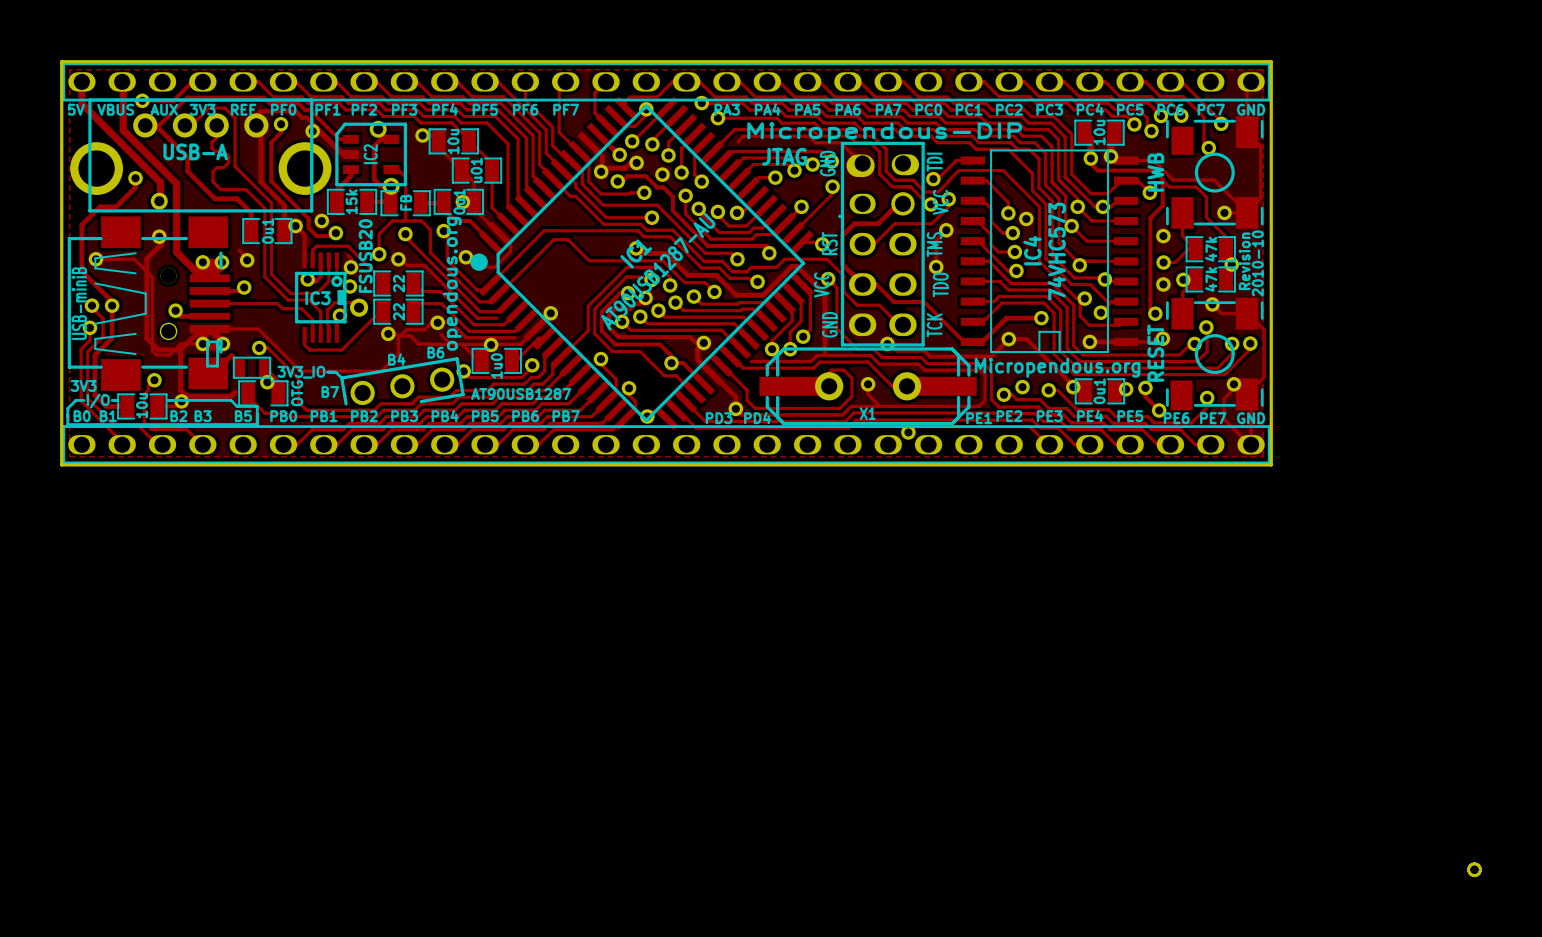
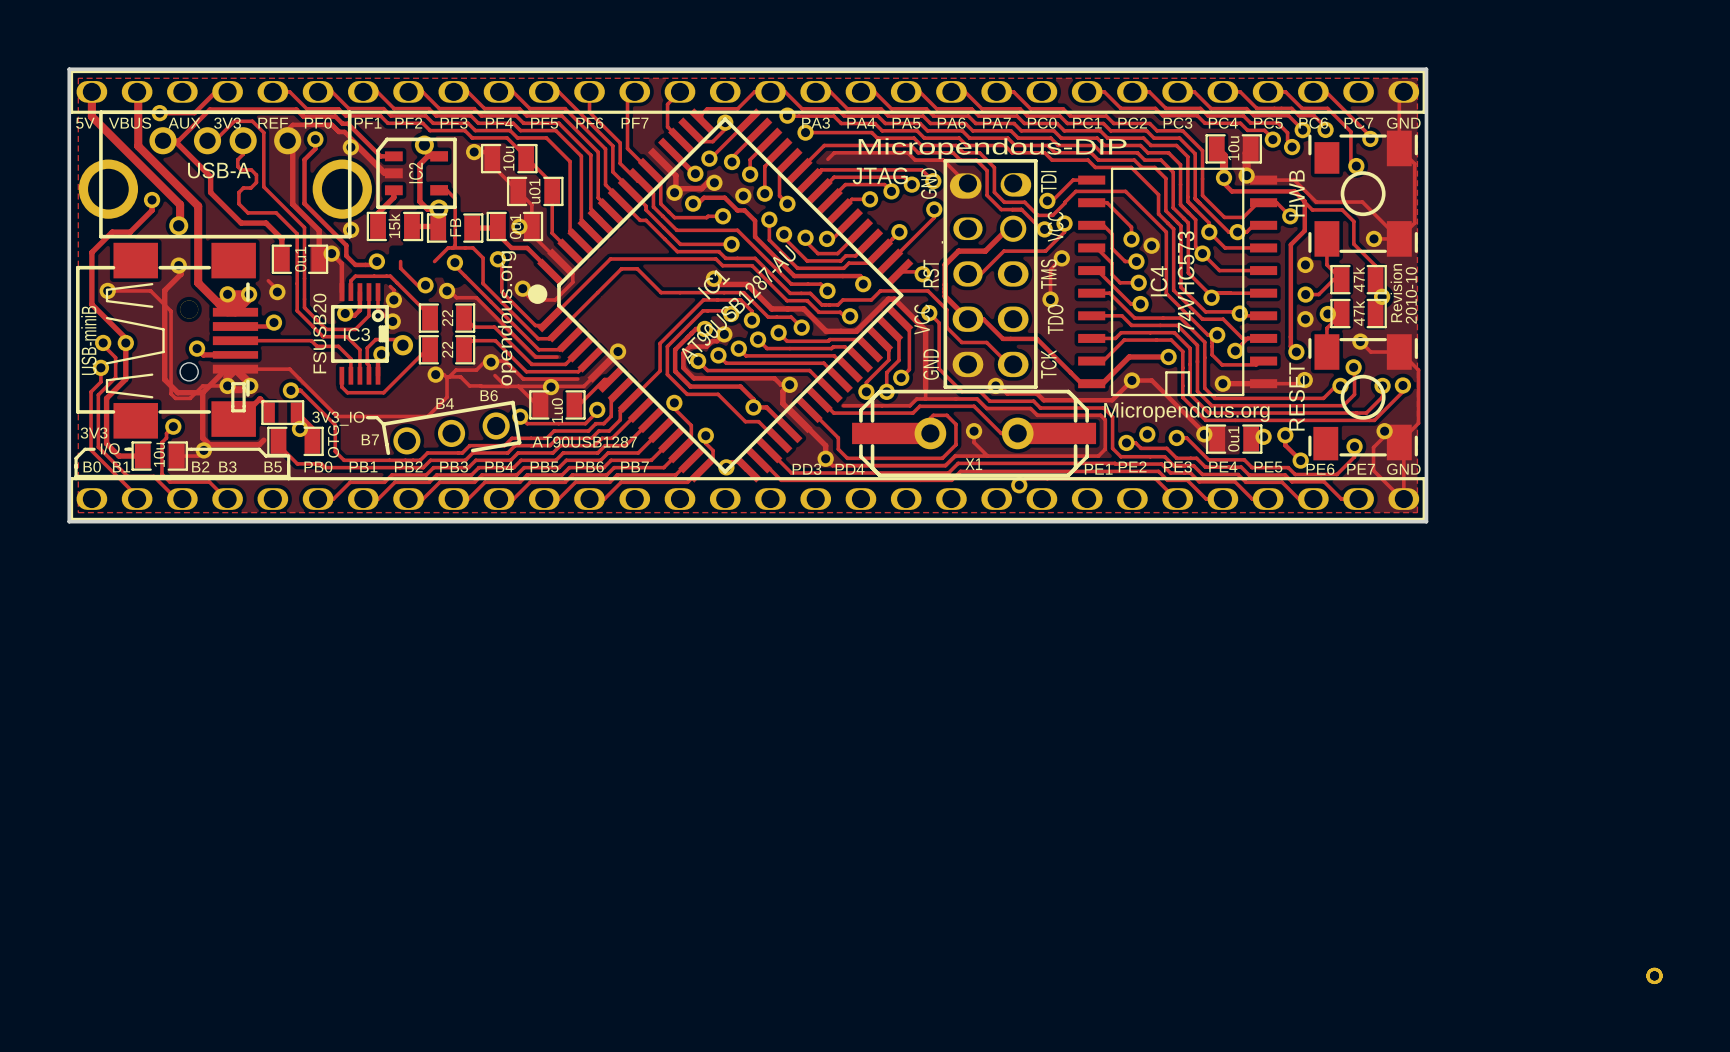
part position: (321, 220) -> (351, 229)
track: (399, 220) (392, 220) (379, 234) (379, 254) -> (448, 247) (434, 261)
track: none -> (400, 261) (400, 268) (419, 287) (425, 287)
IC3 value position: FSUSB20 (365, 255) -> FSUSB20 (319, 333)

